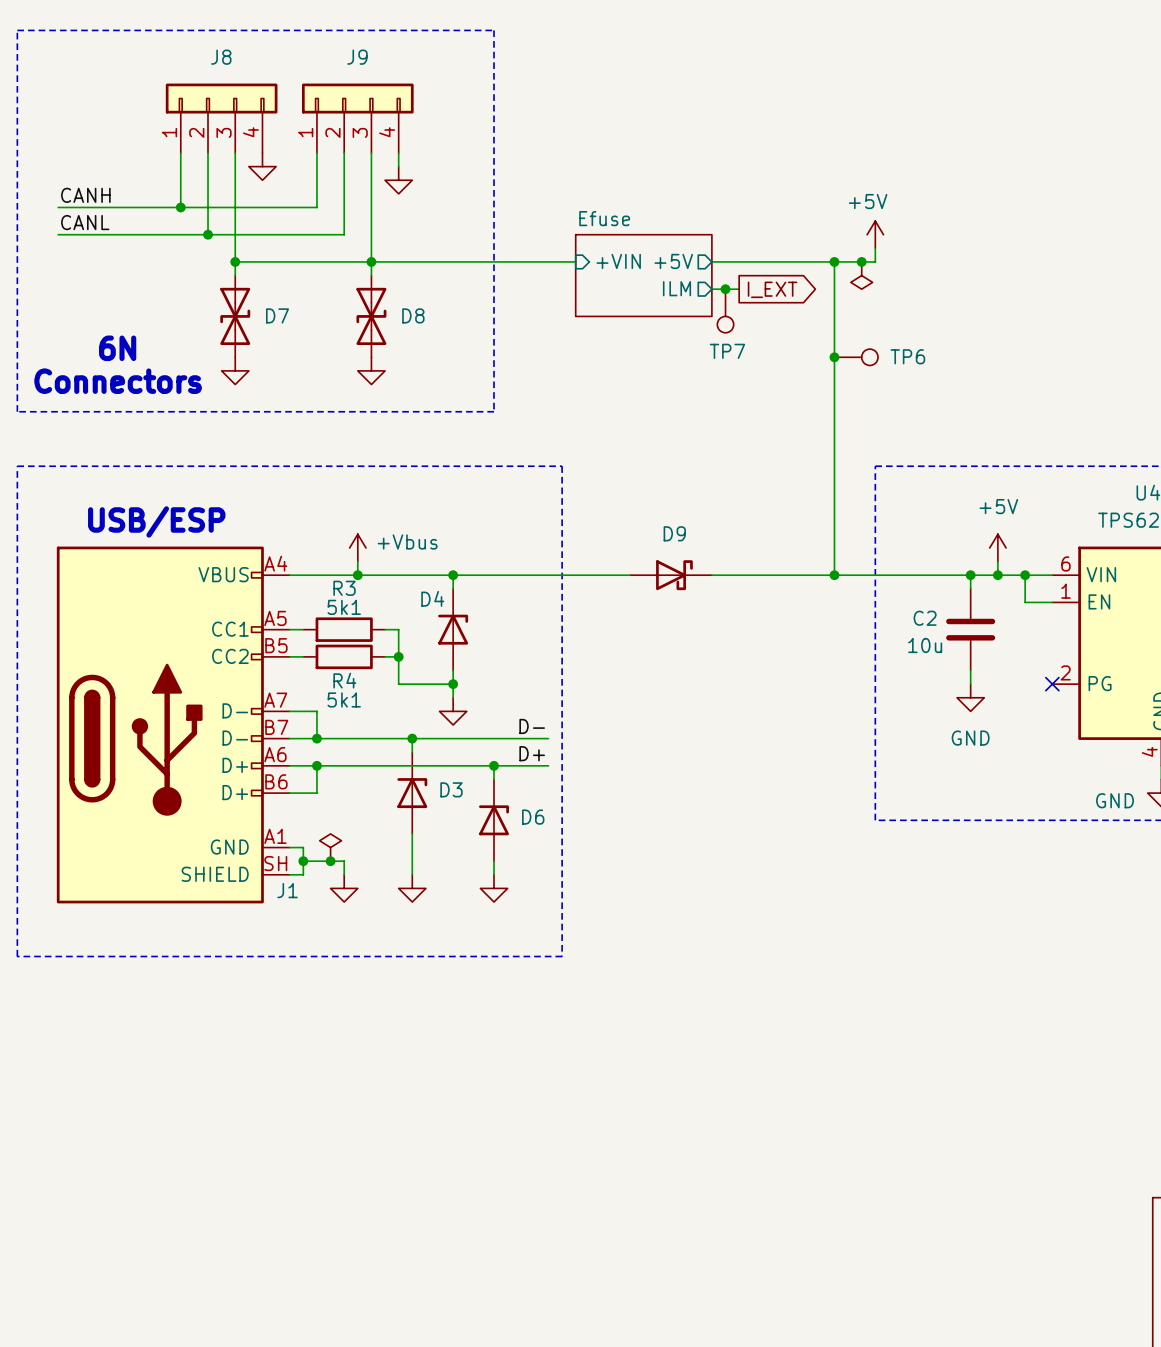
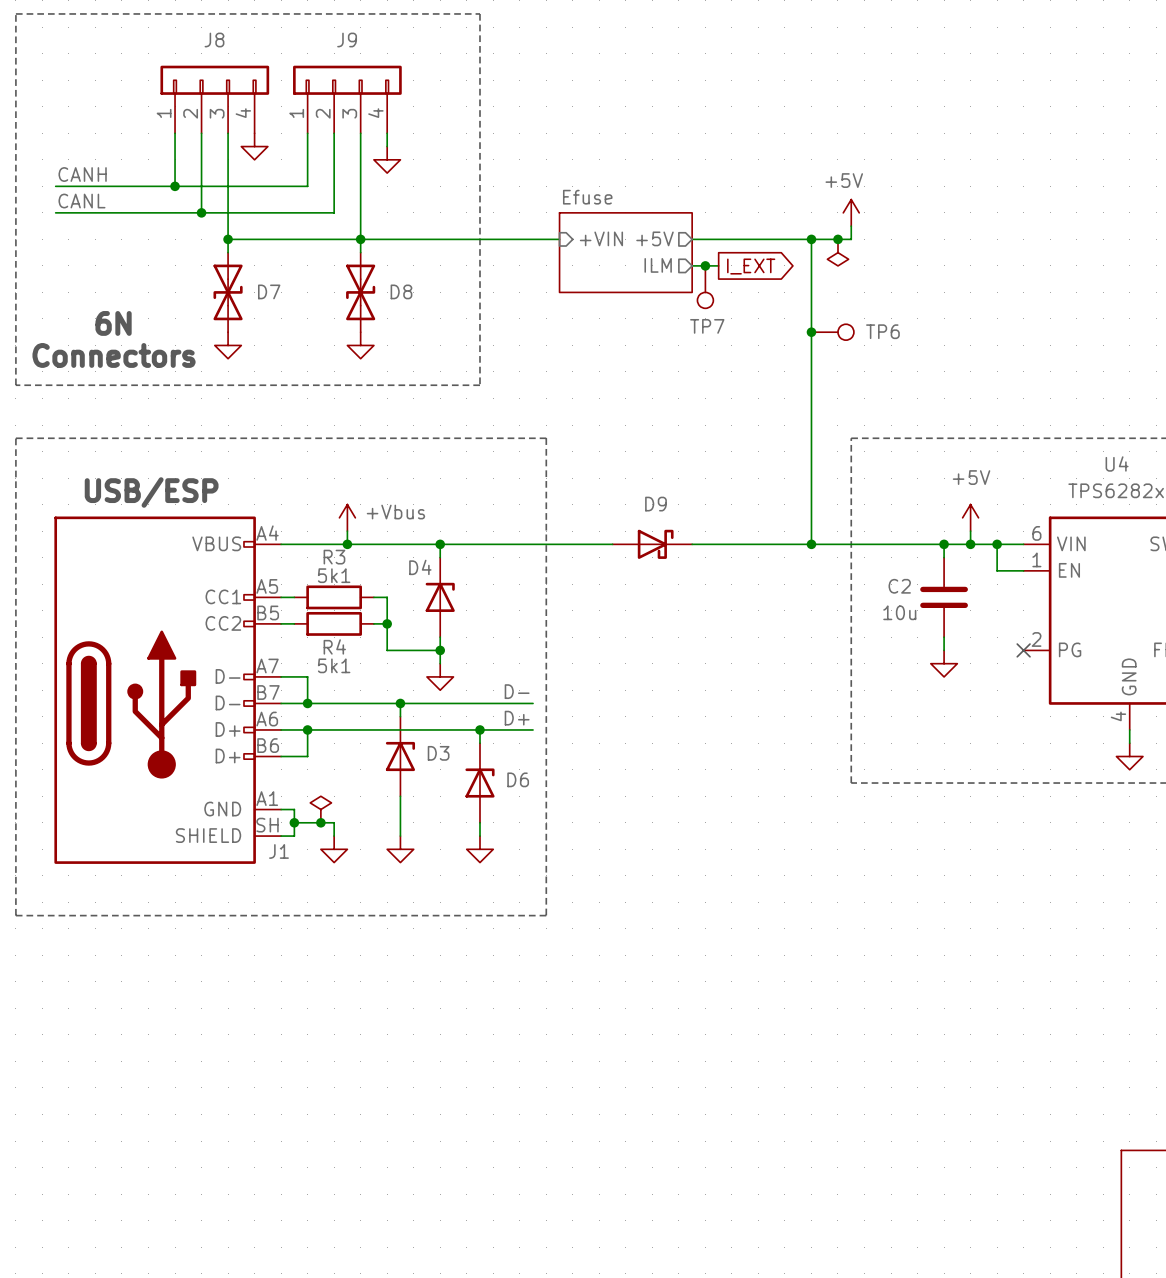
power symbol text: GND (970, 738) -> none
power symbol text: GND (1115, 800) -> none

